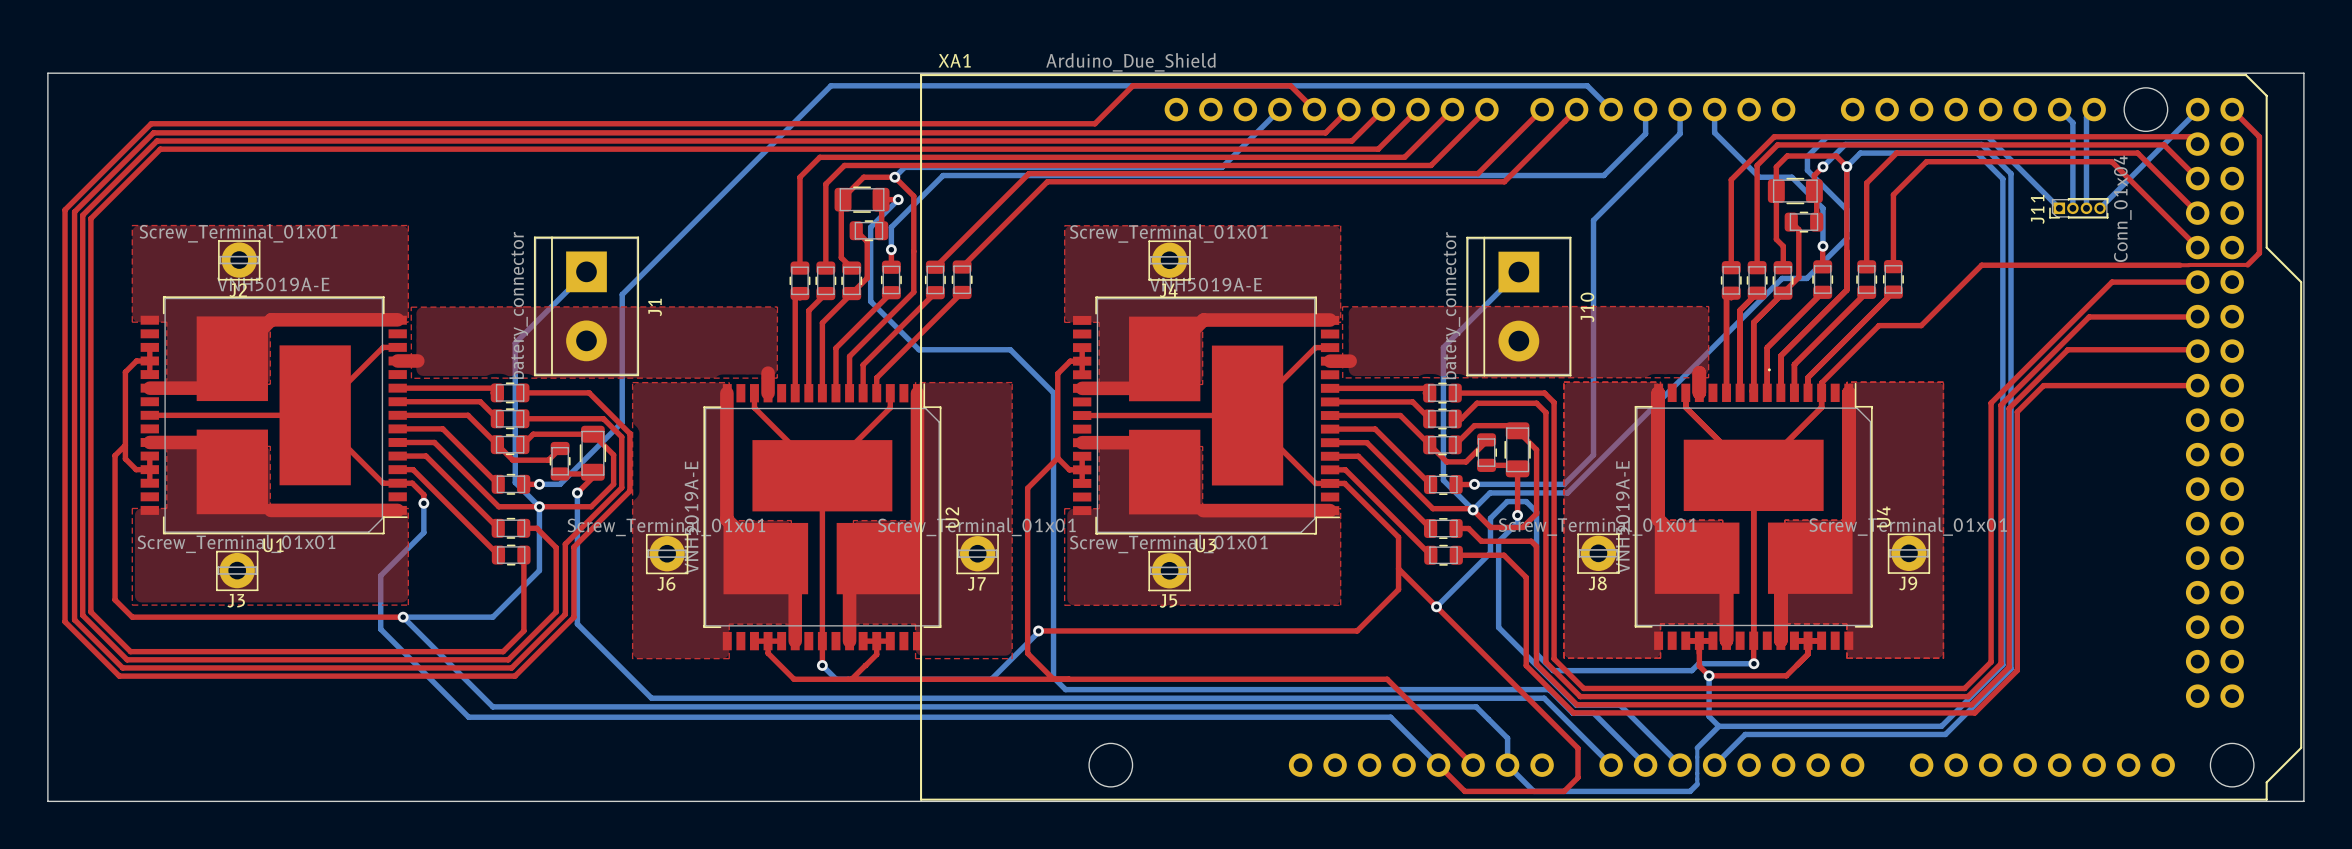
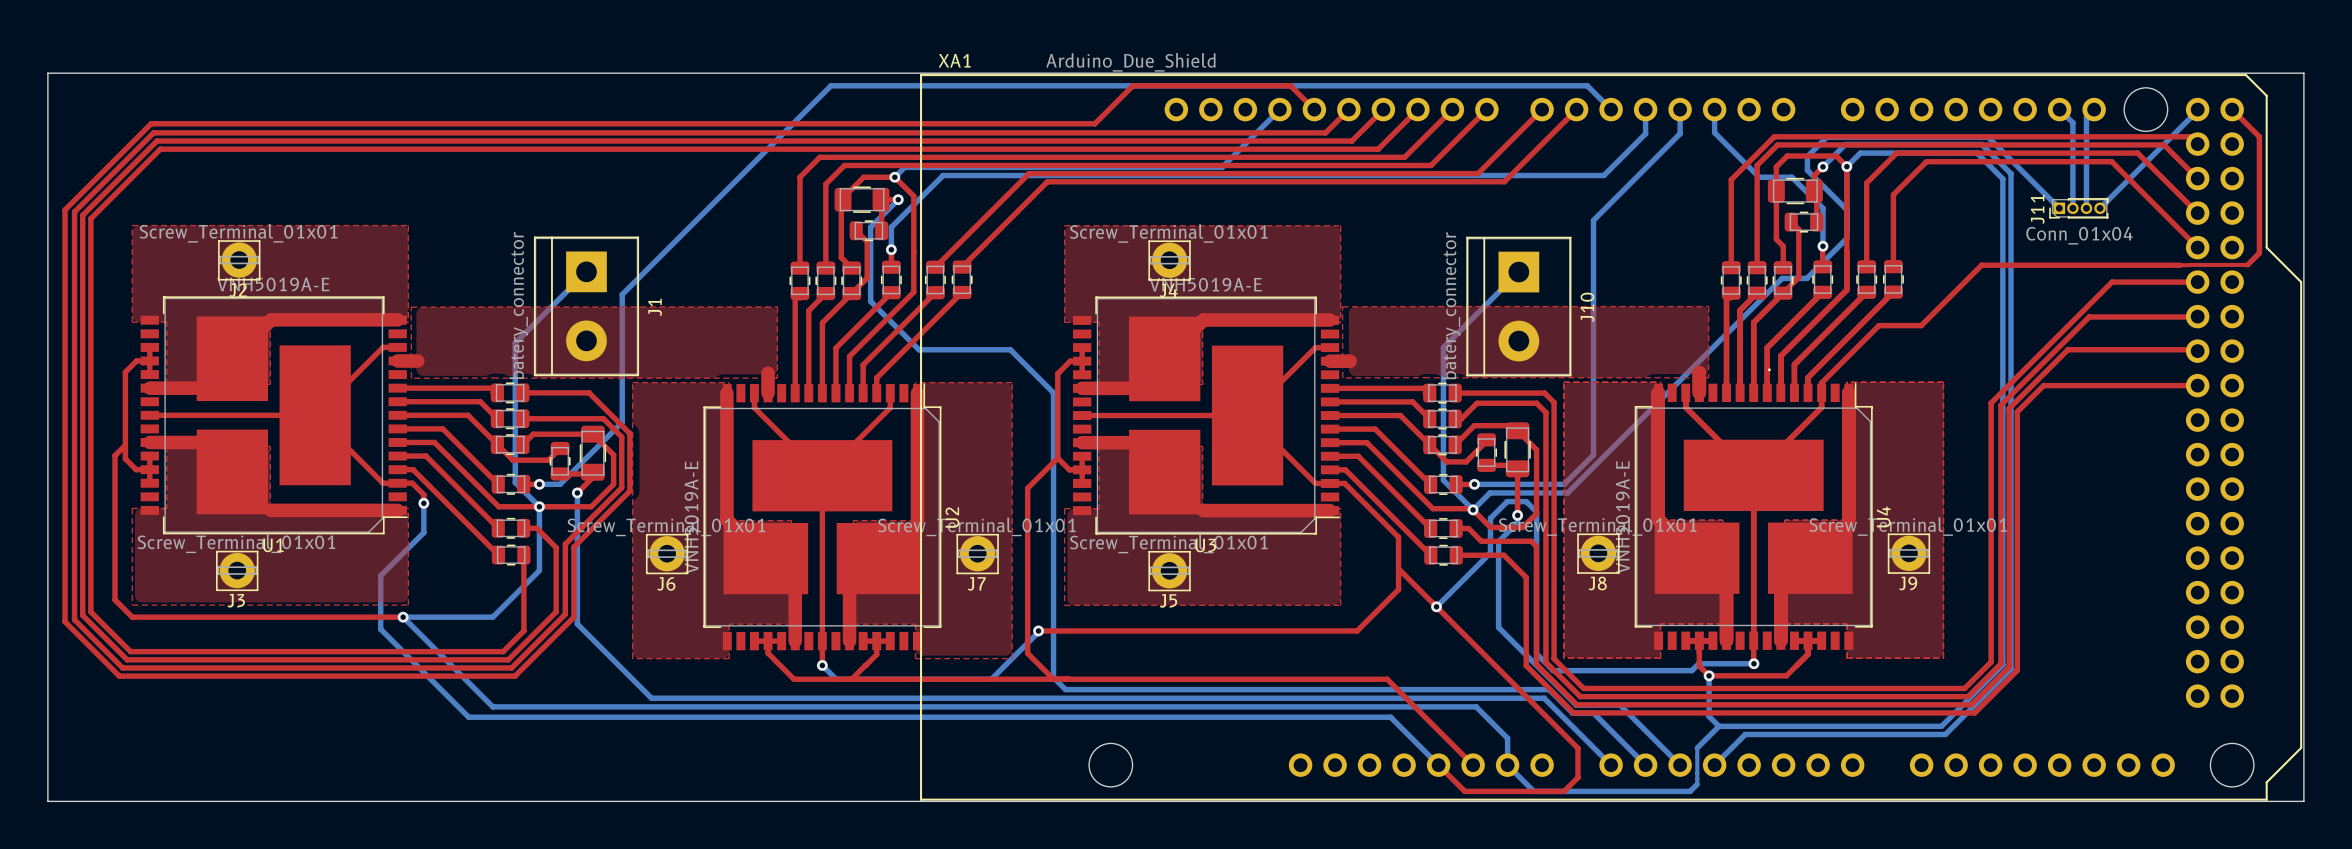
J11 value rotation: 0° (2122, 208) -> 90° clockwise (2079, 235)

